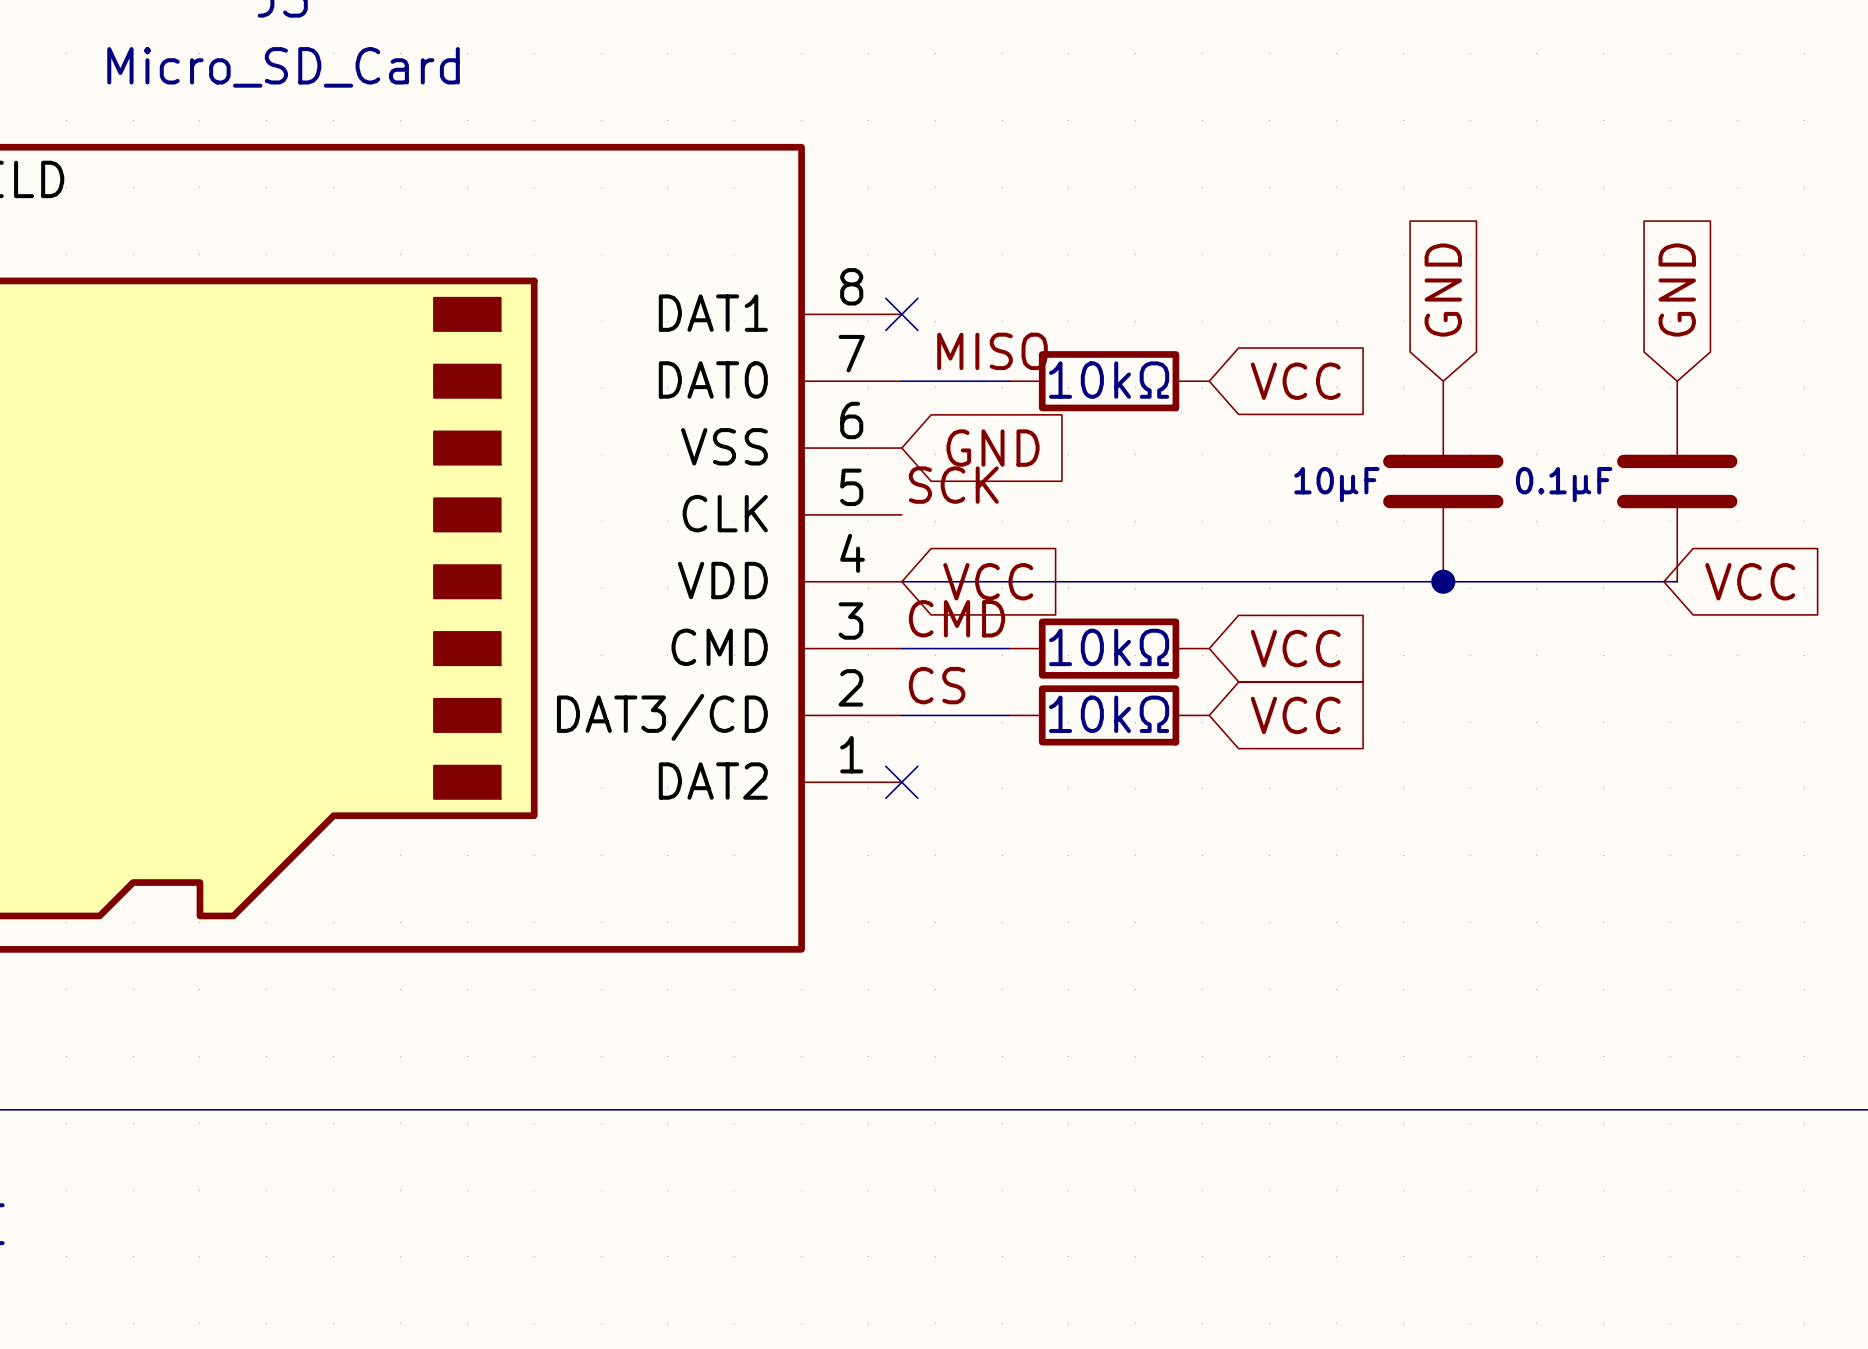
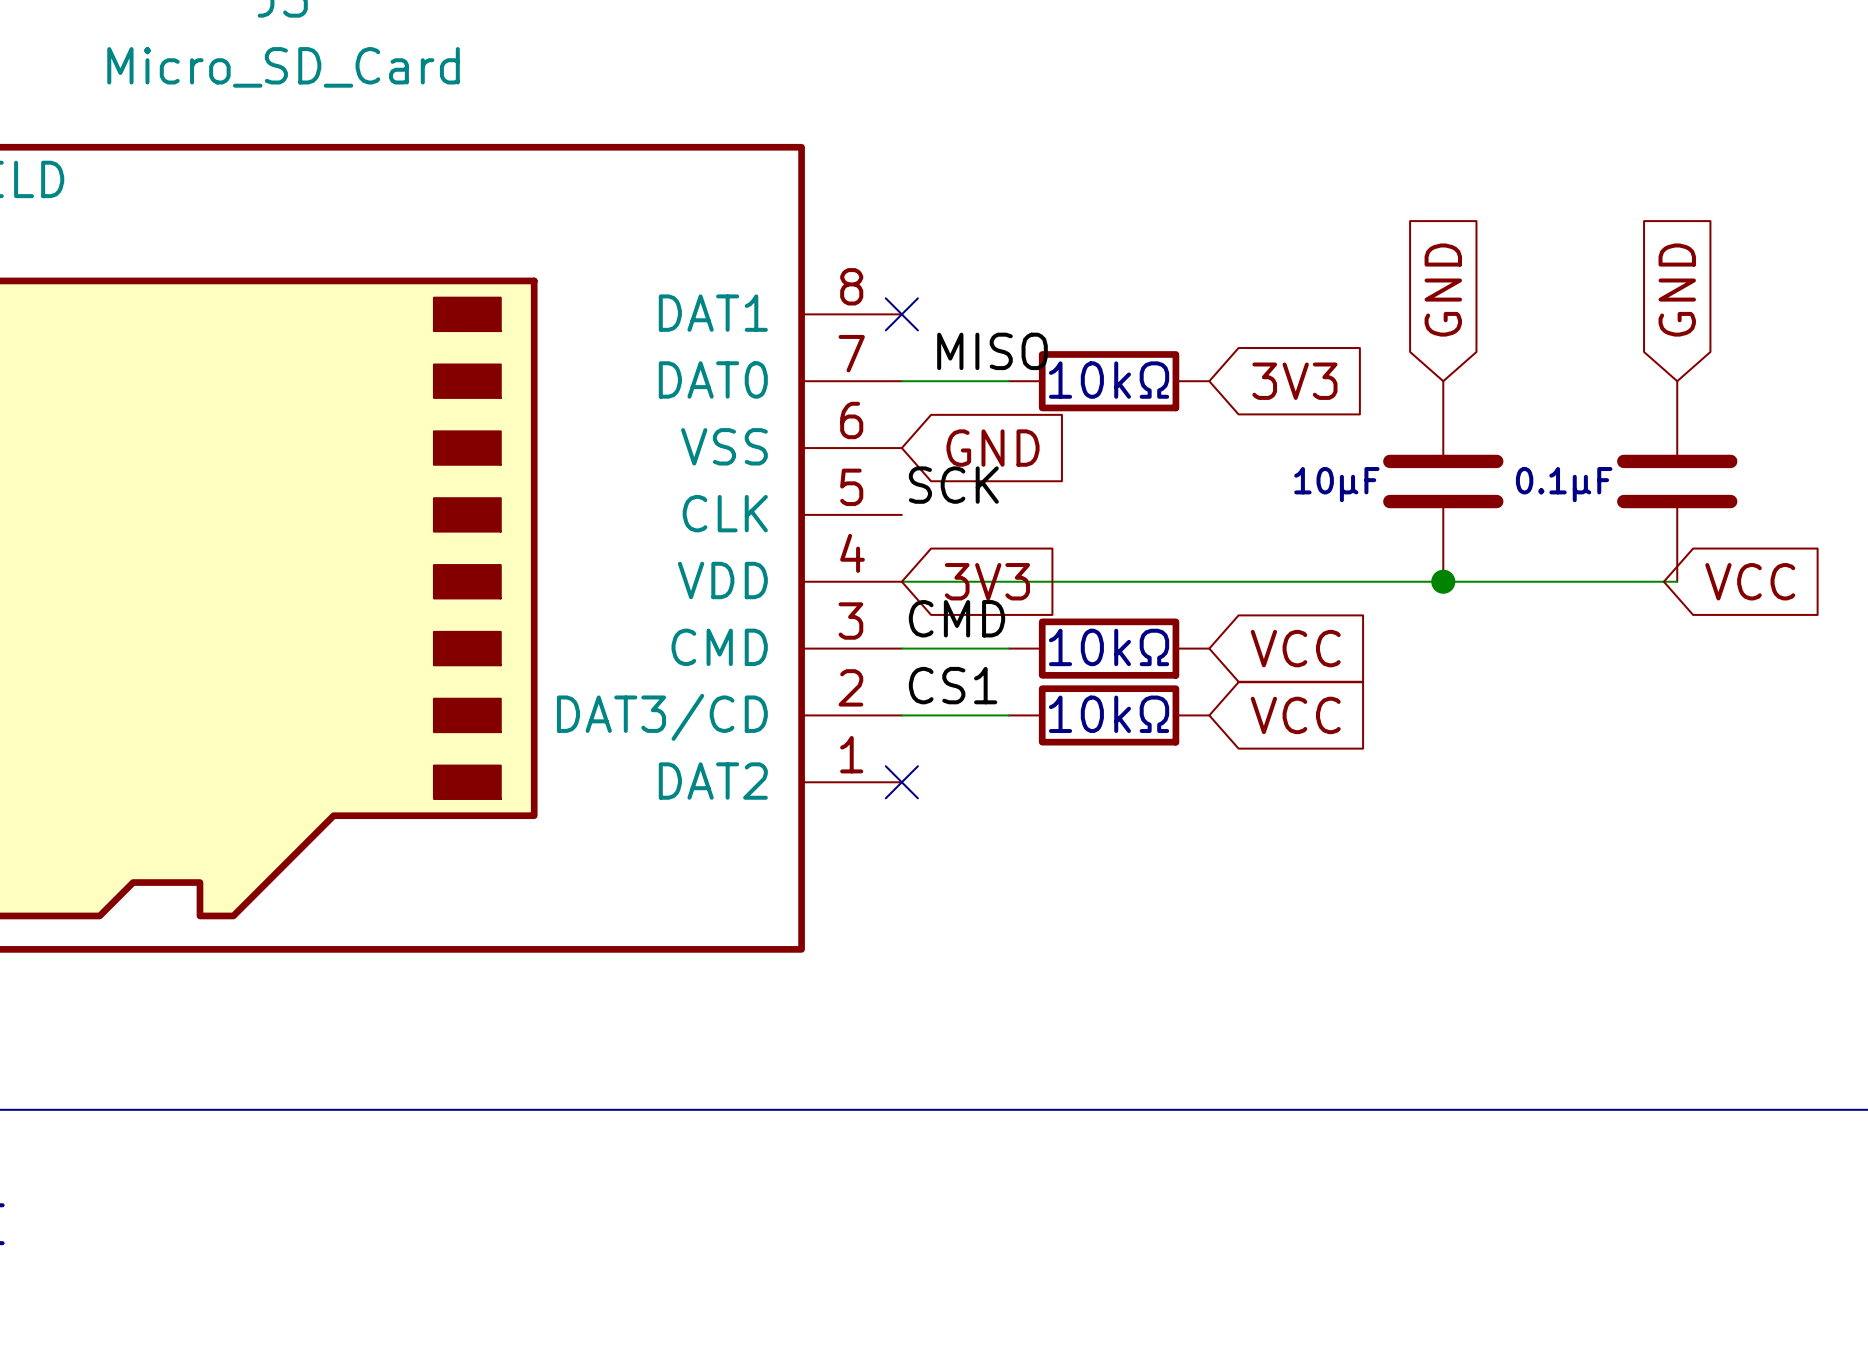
global label: VCC (1295, 381) -> 3V3 (1294, 381)
global label: VCC (988, 581) -> 3V3 (987, 581)
label: CS (937, 685) -> CS1 (953, 685)

